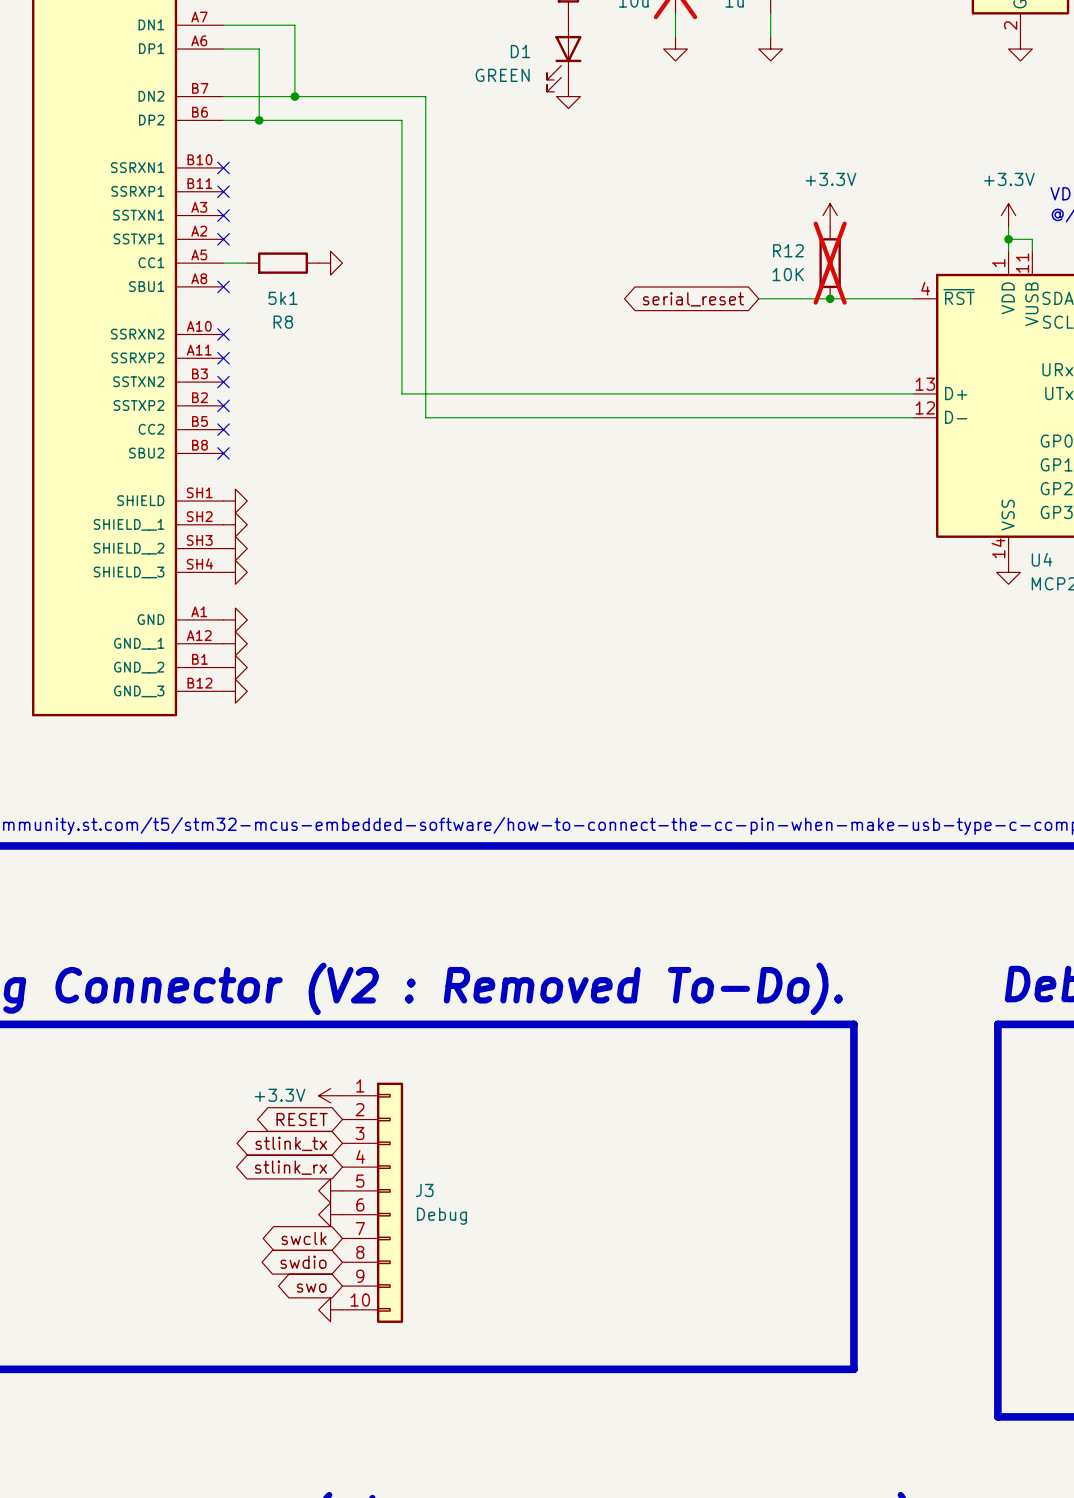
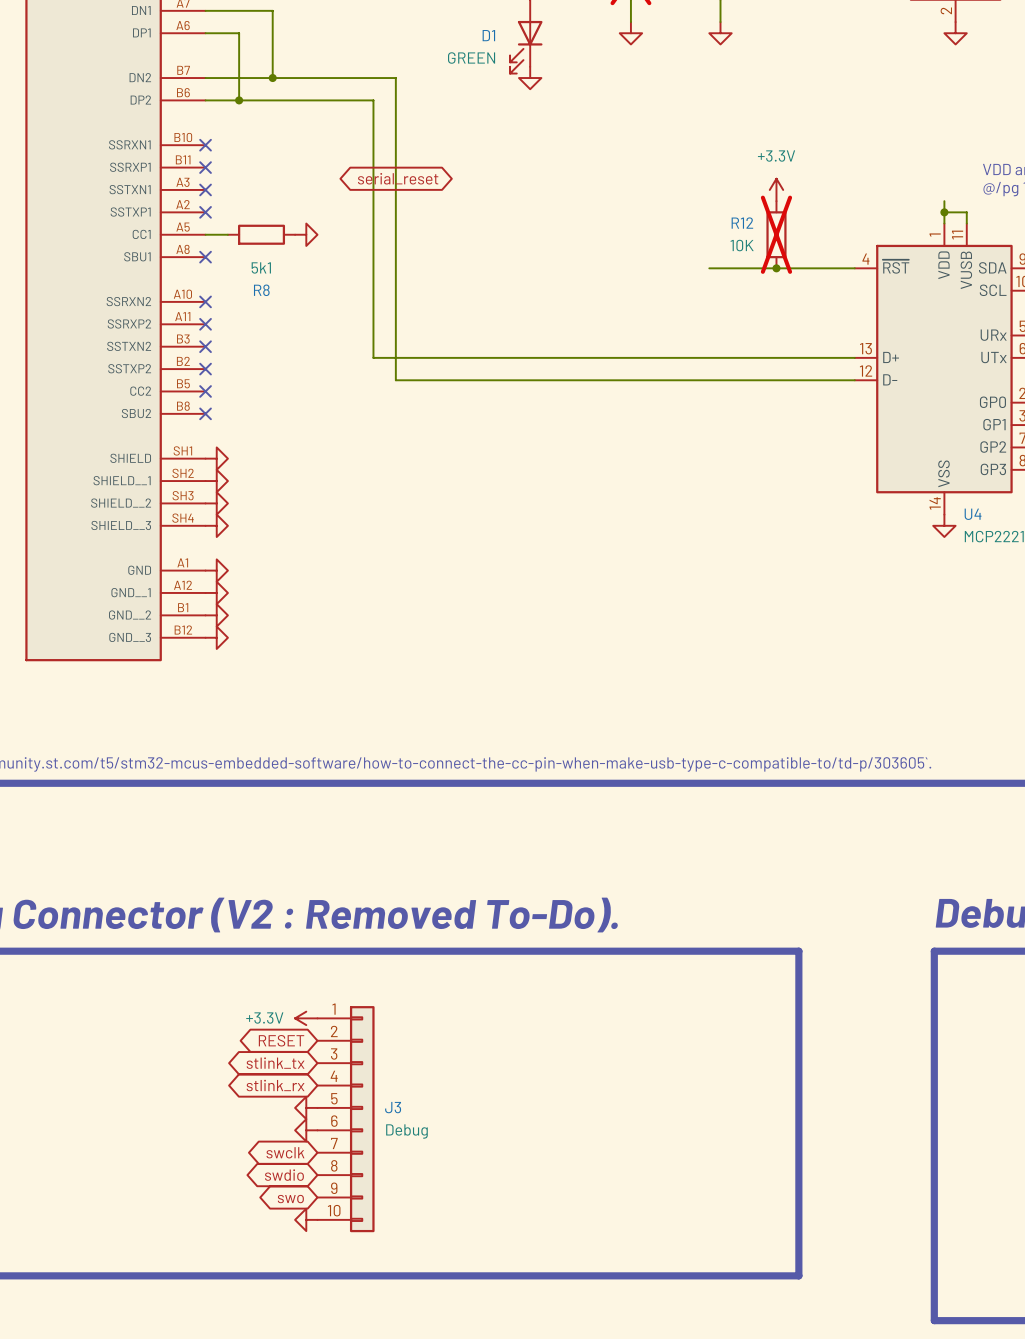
global label: none -> serial_reset (398, 178)
power symbol: +3.3V (1008, 215) -> none
global label: serial_reset (693, 299) -> none

